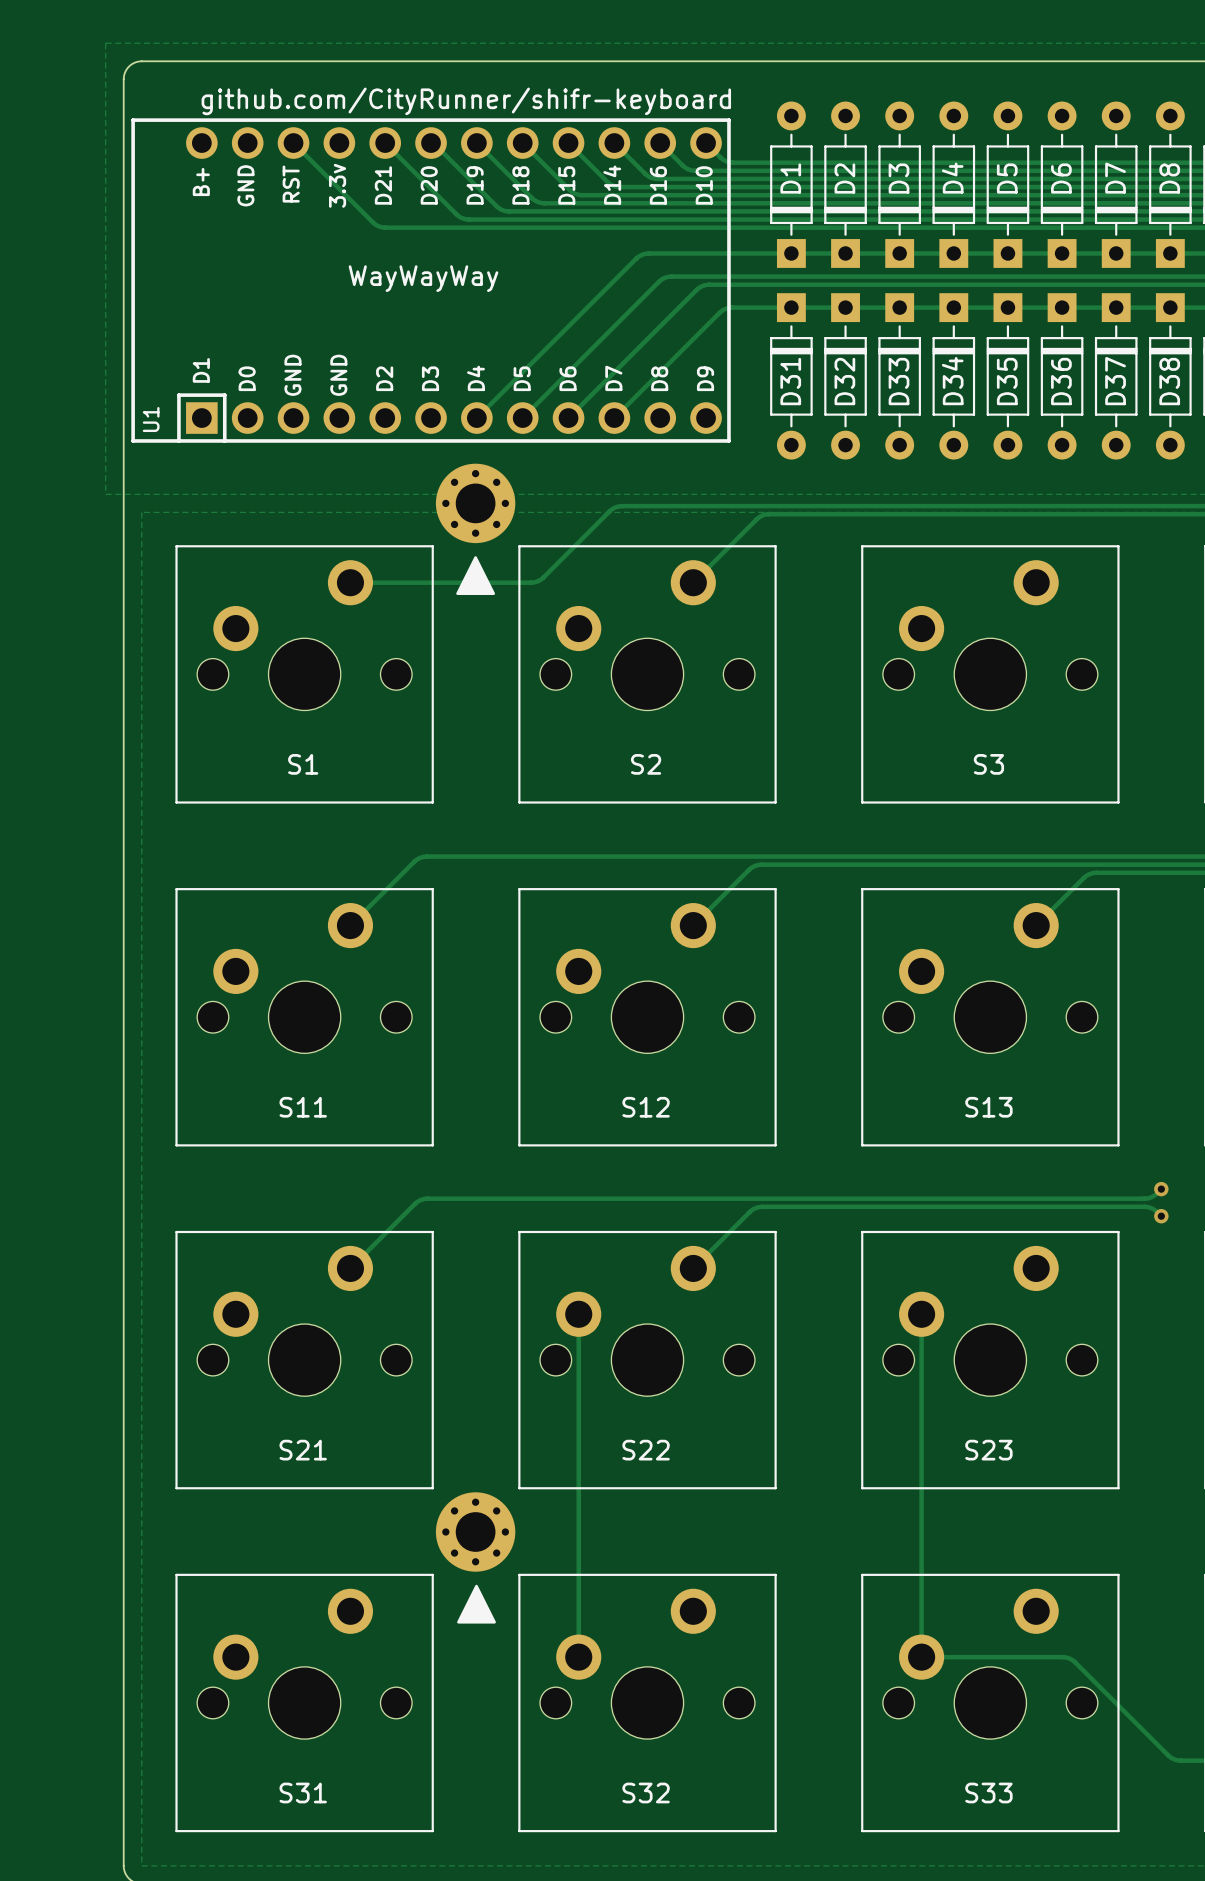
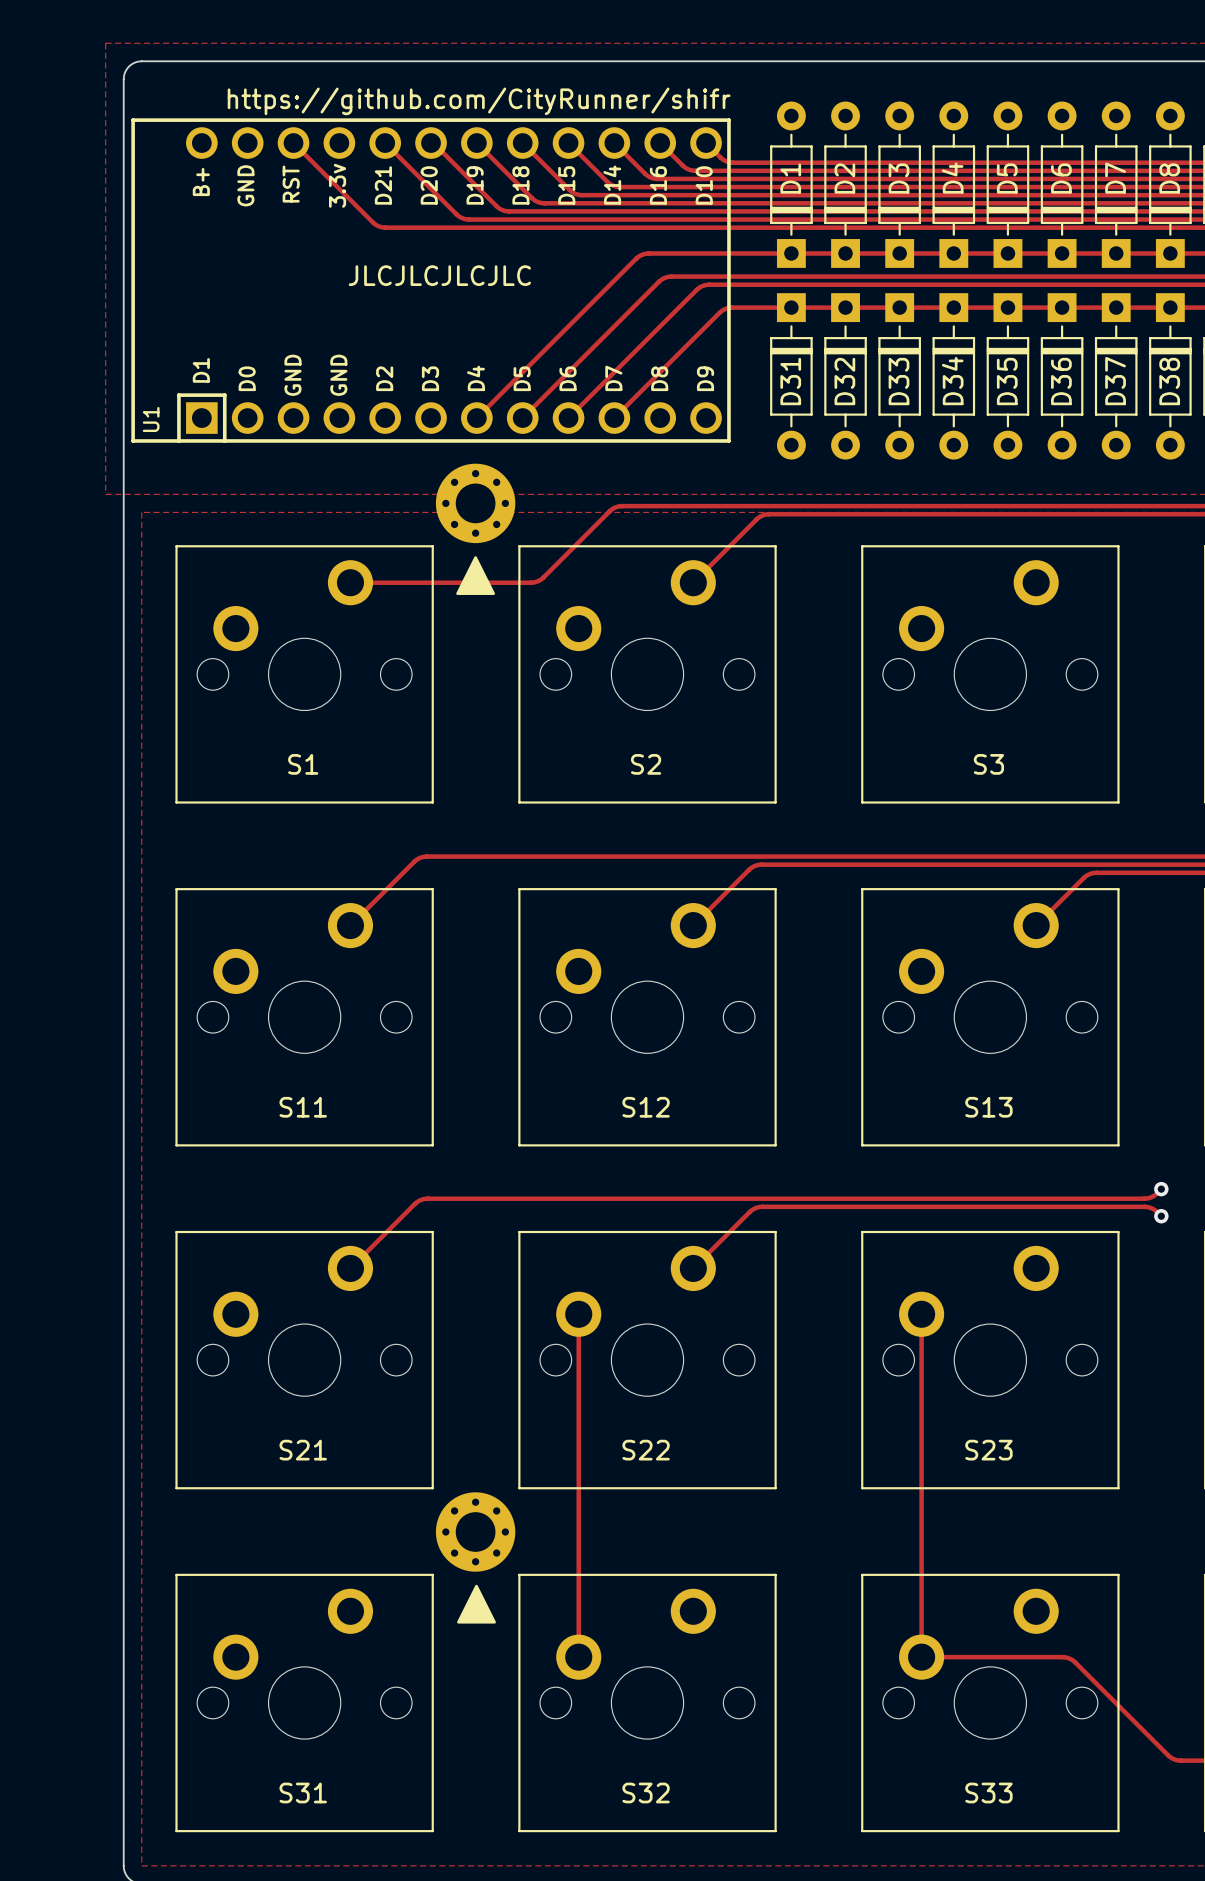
text: github.com/CityRunner/shifr-keyboard (466, 101) -> https://github.com/CityRunner/shifr (479, 101)
text: WayWayWay (423, 278) -> JLCJLCJLCJLC (439, 275)

